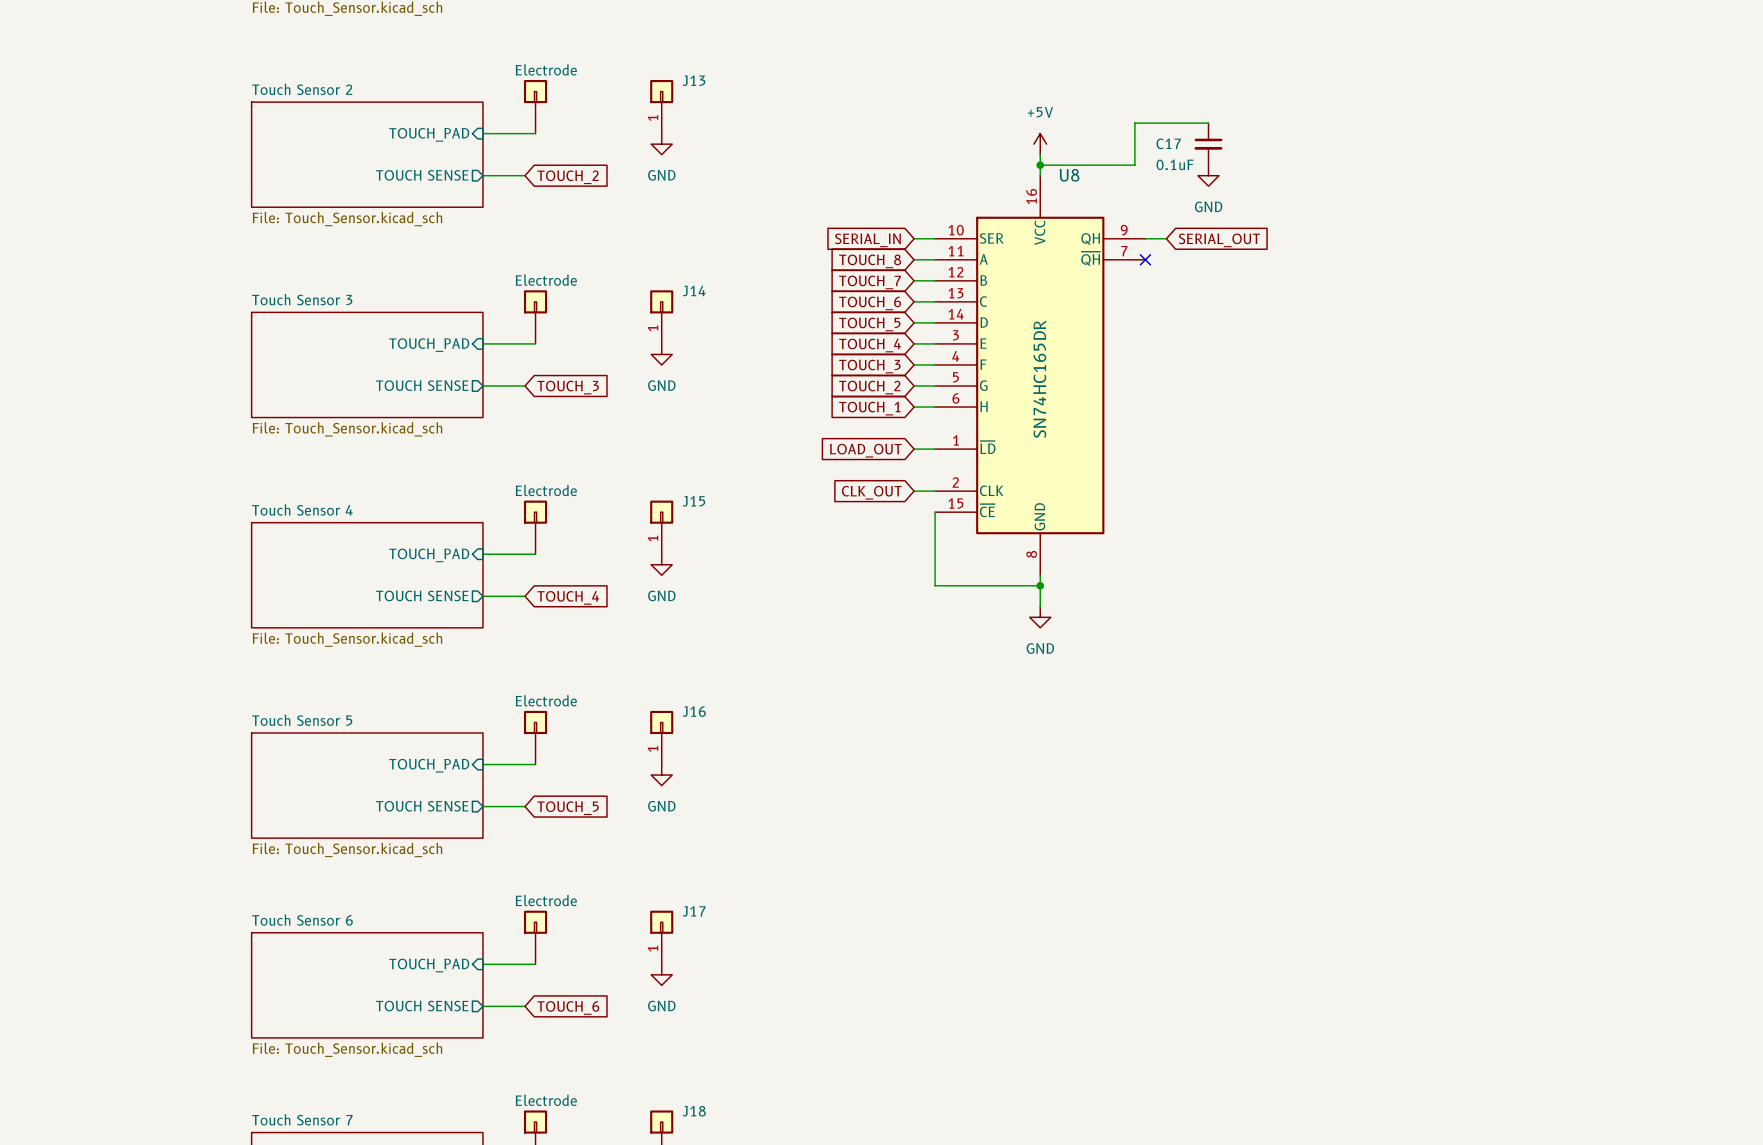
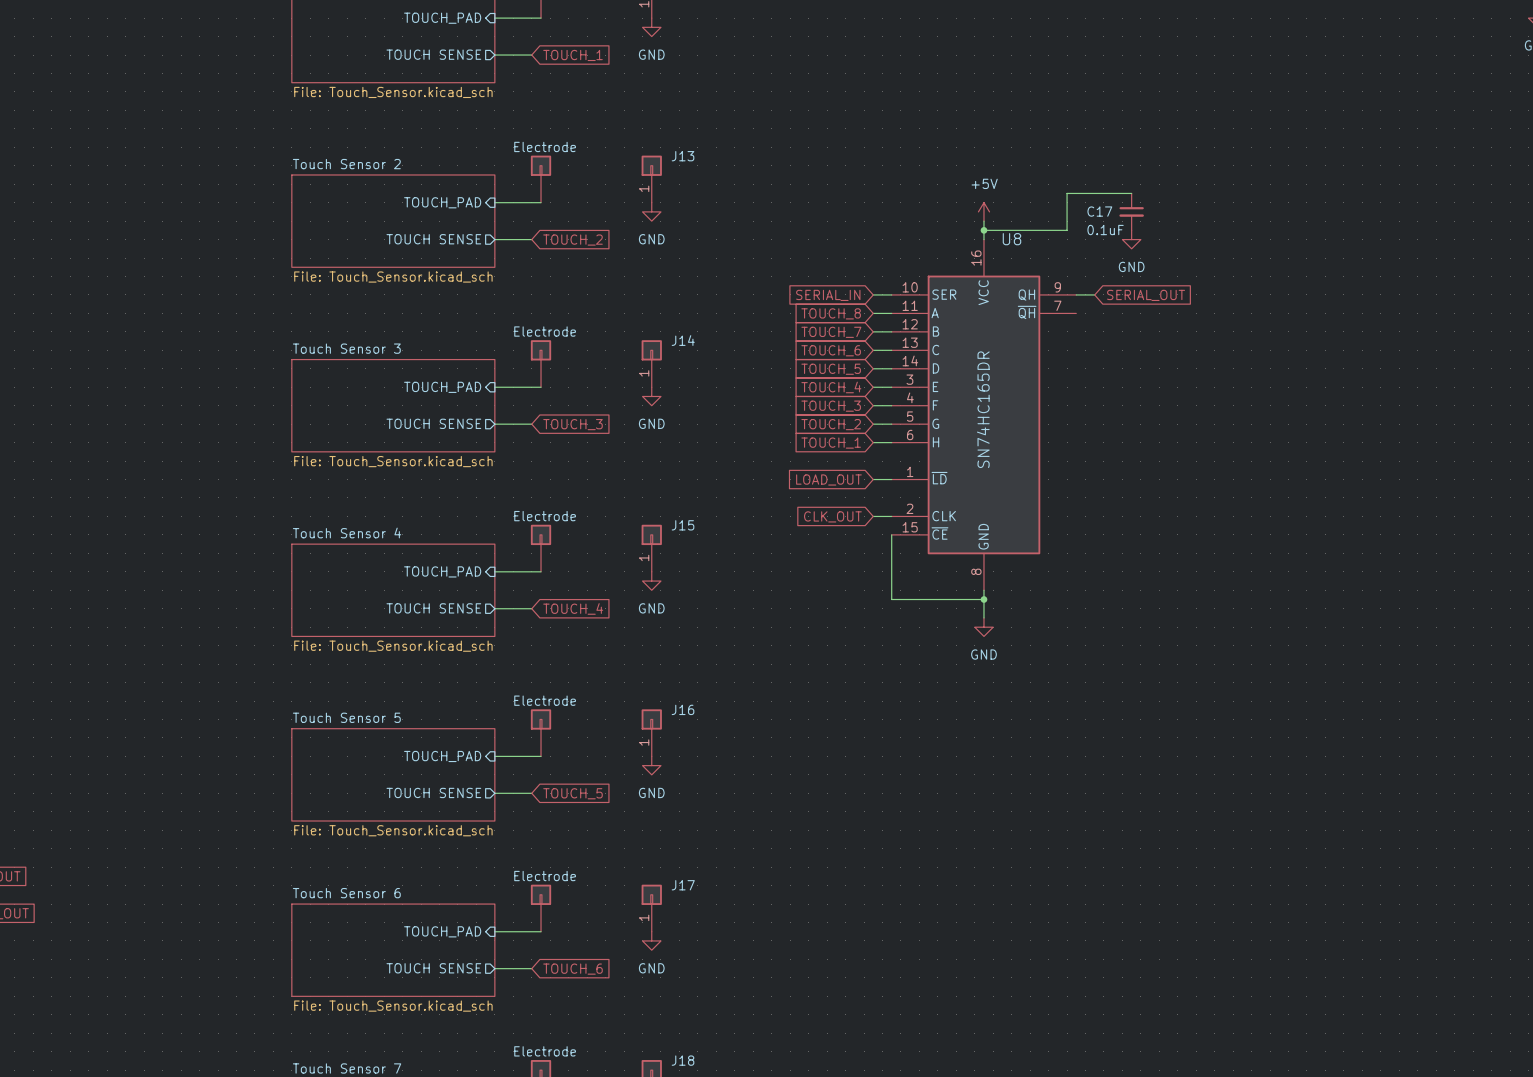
no-connect mark: (1145, 259) -> none

